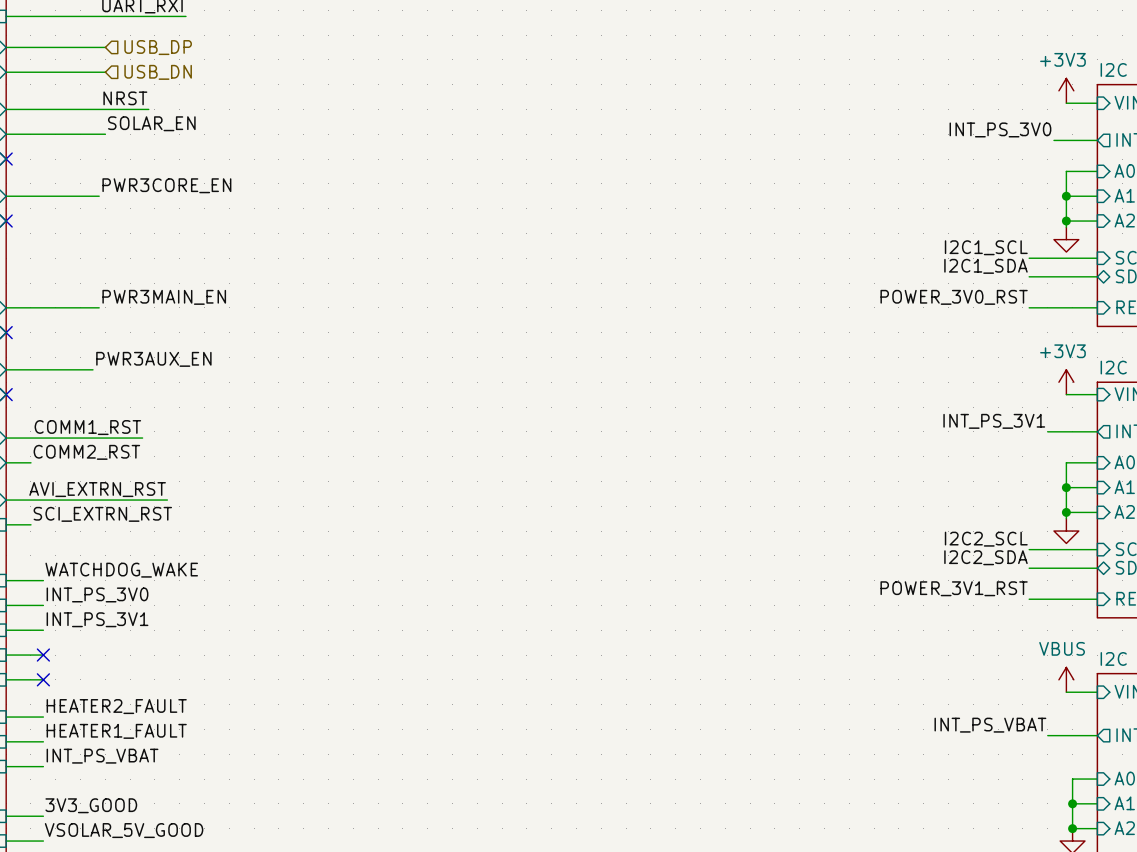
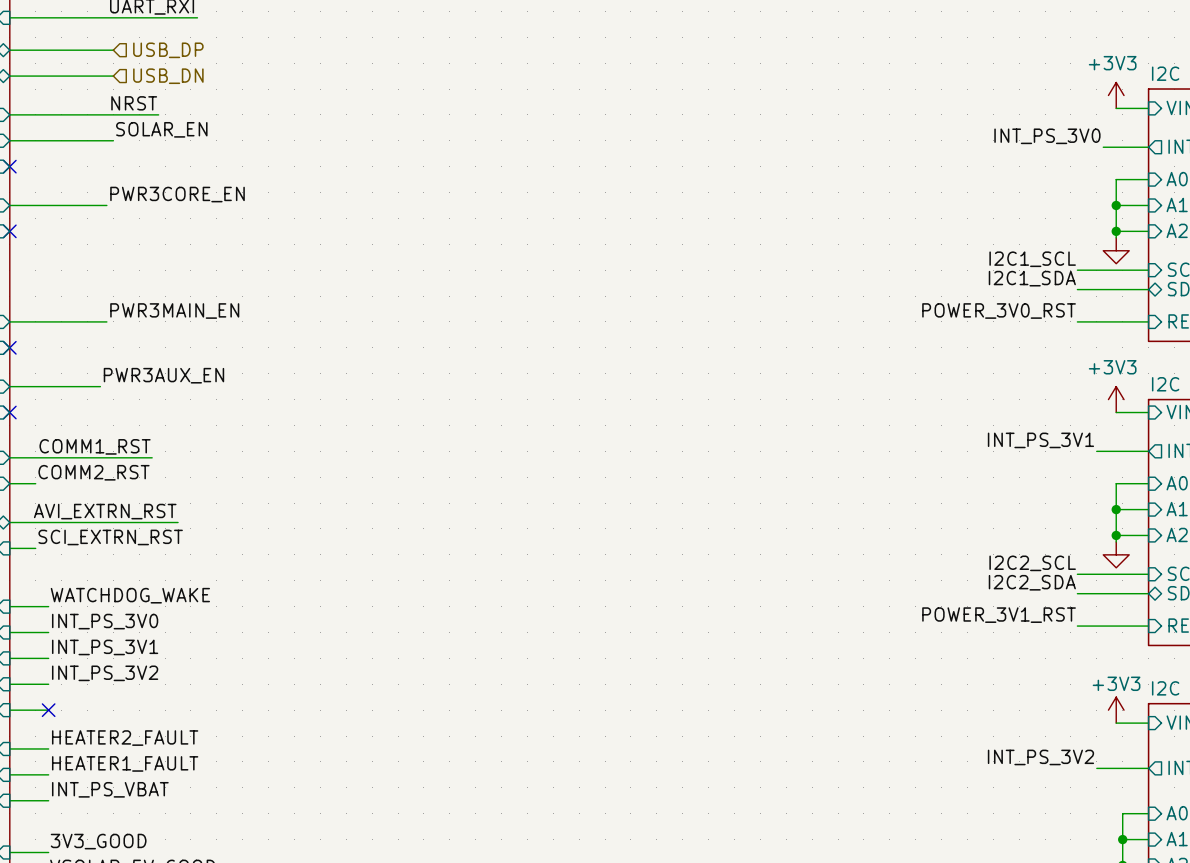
label: none -> INT_PS_3V2 (105, 673)
no-connect mark: (43, 655) -> none
power symbol: VBUS (1066, 679) -> +3V3 (1116, 710)
label: INT_PS_VBAT (990, 725) -> INT_PS_3V2 (1040, 757)

